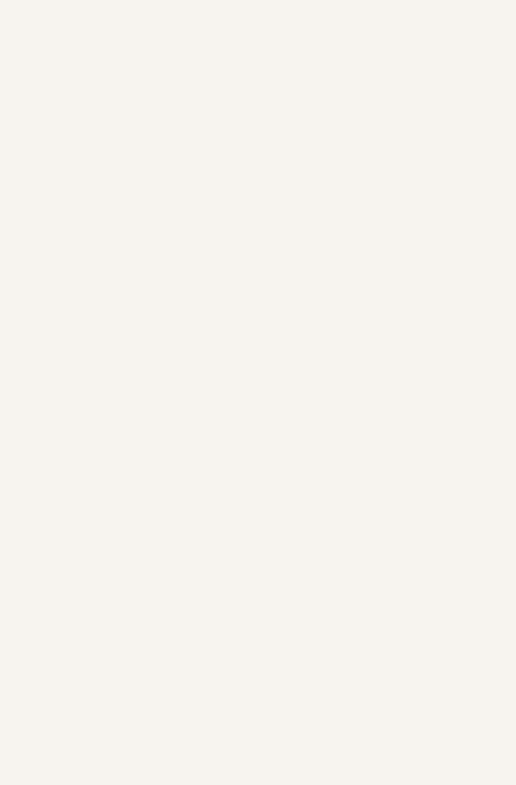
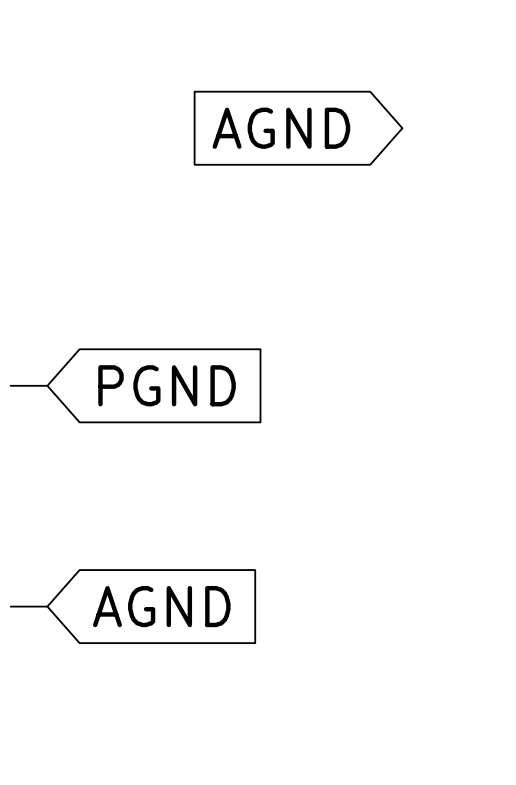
global label: none -> AGND (281, 128)
wire: none -> (10, 385) (47, 385)
global label: none -> PGND (167, 385)
wire: none -> (10, 606) (47, 606)
global label: none -> AGND (161, 606)

